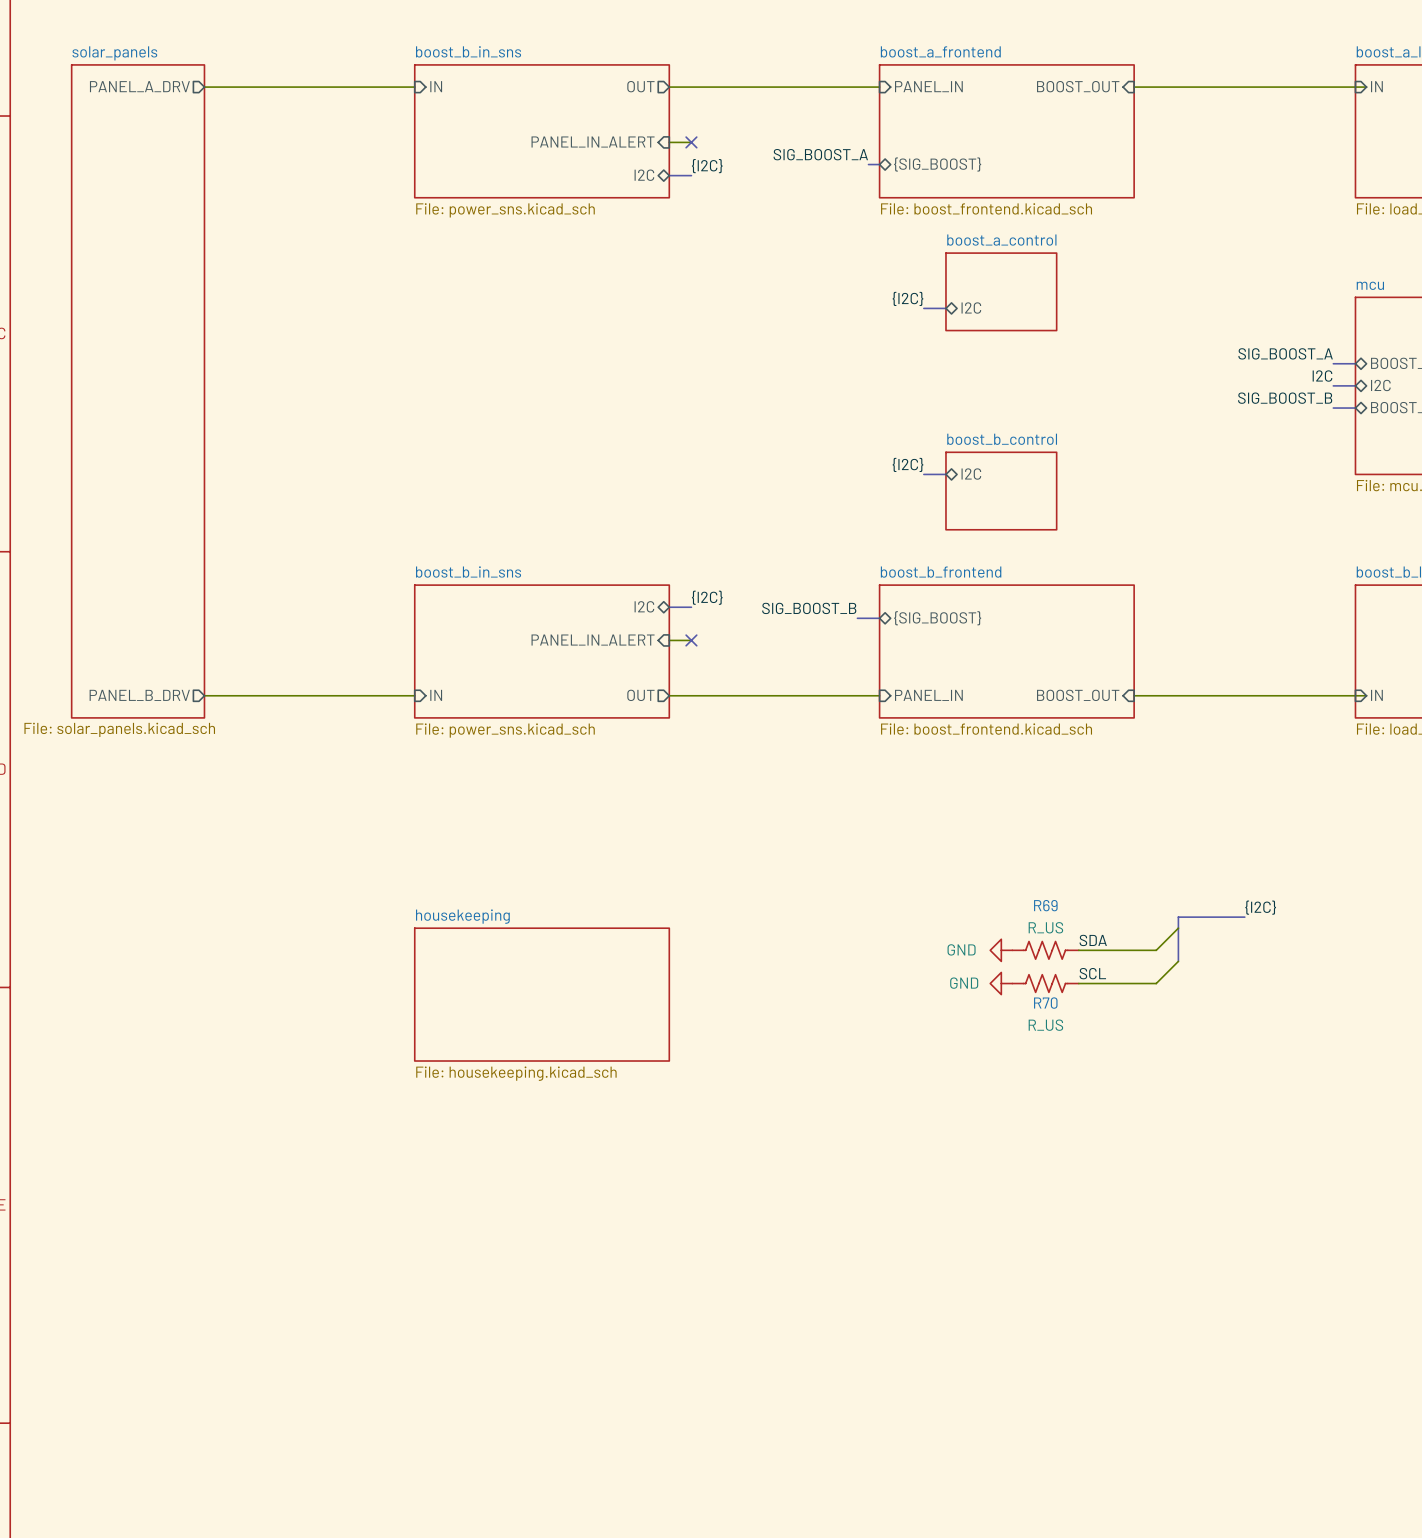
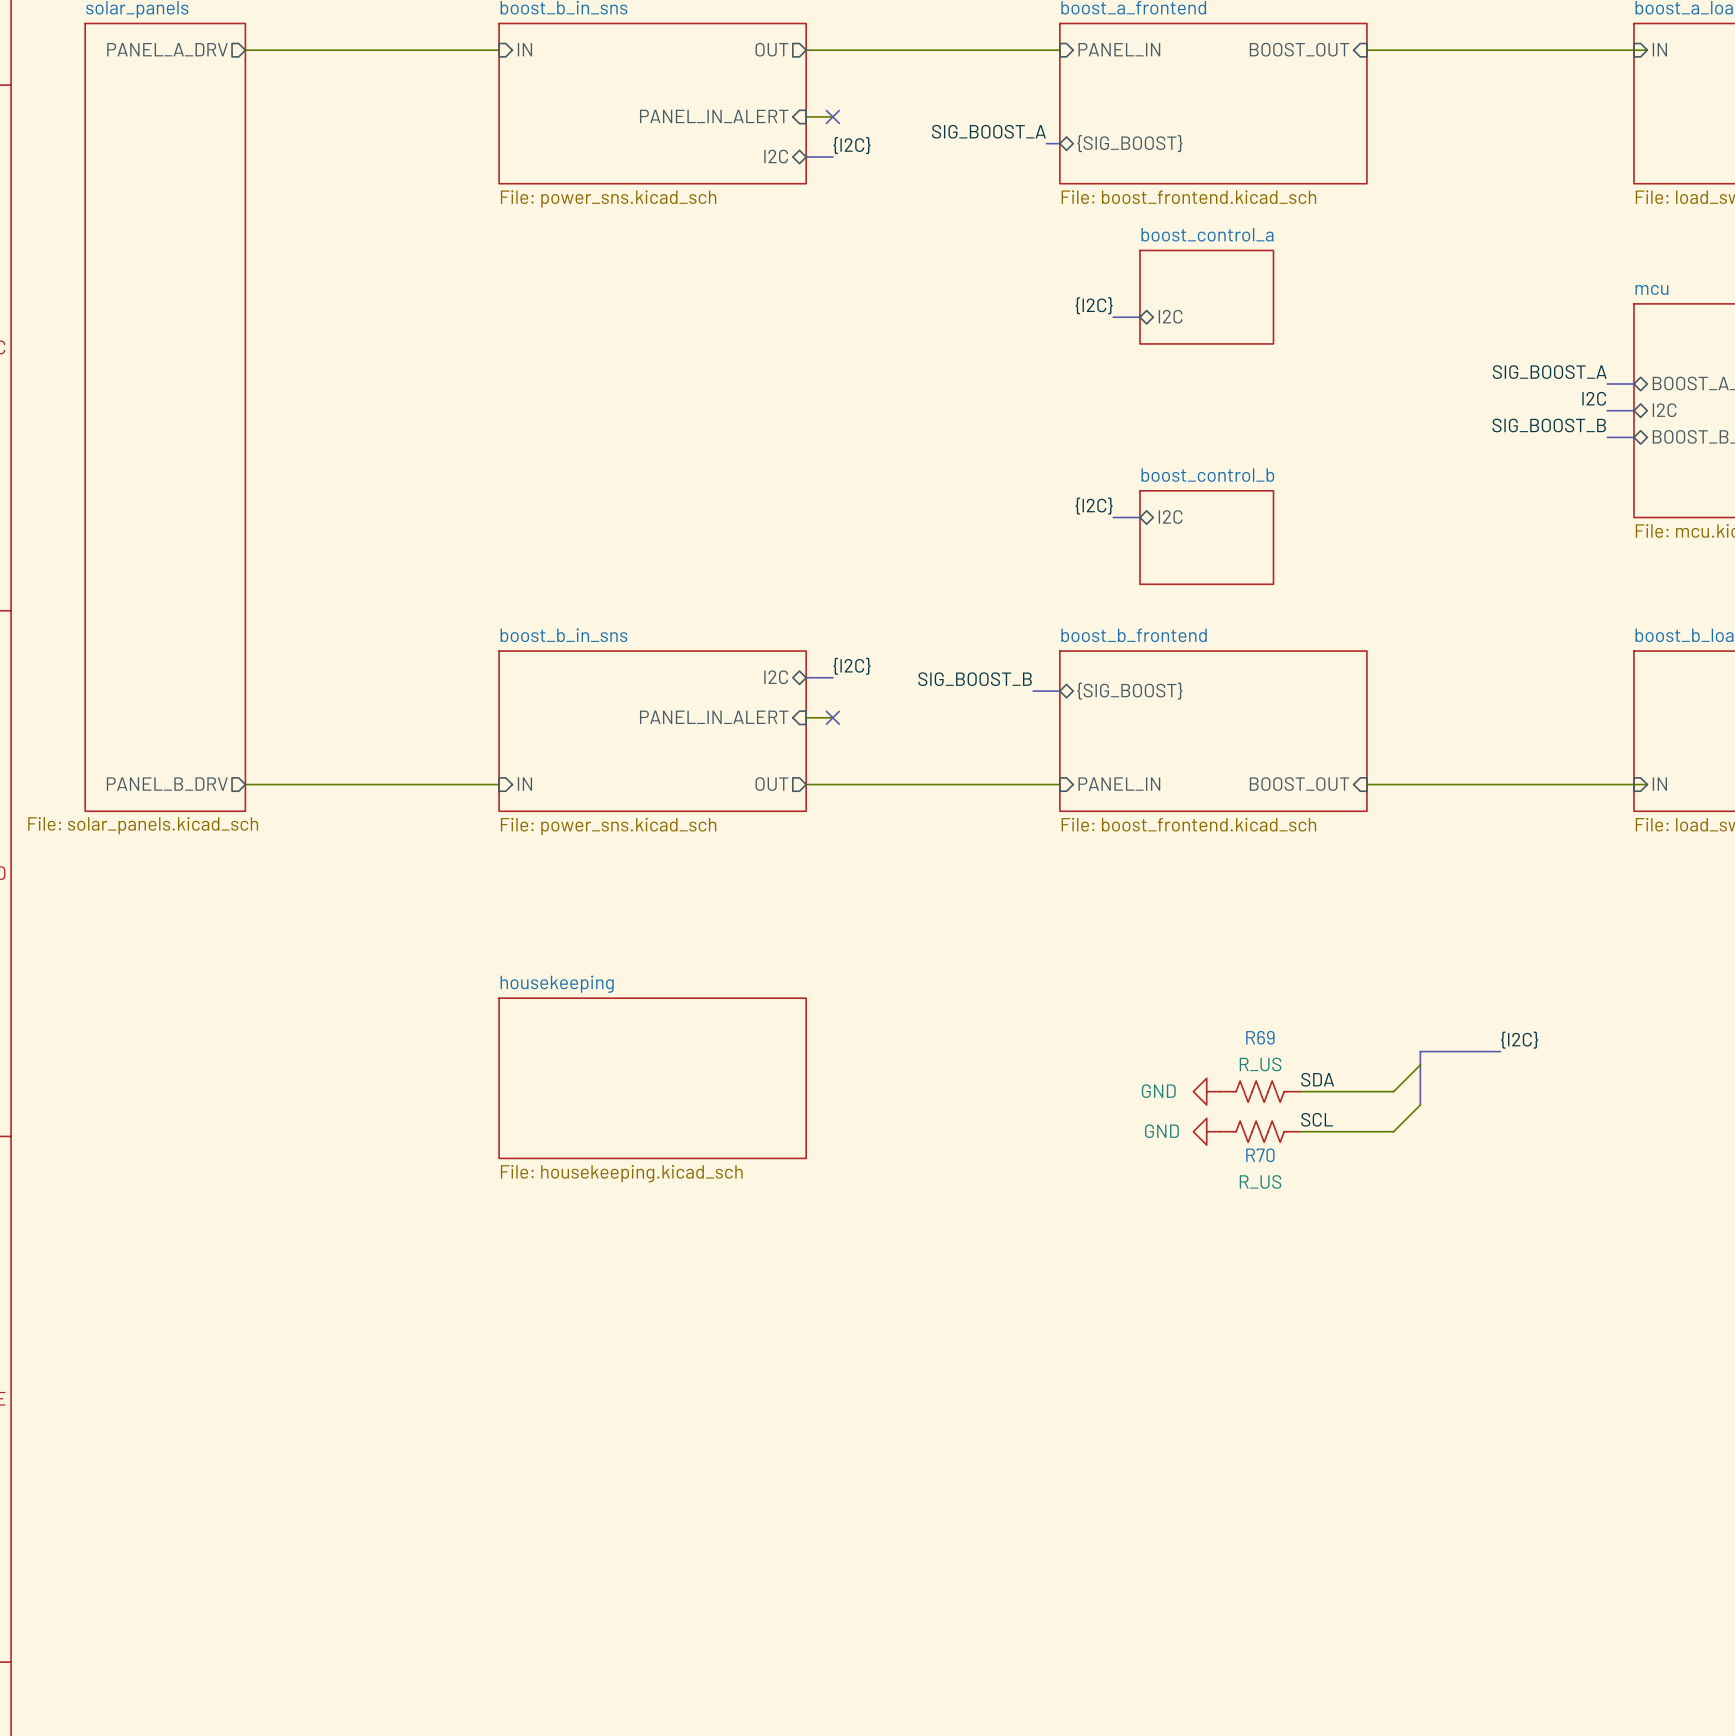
sheet boost_a_control name: boost_a_control (1001, 240) -> boost_control_a (1207, 234)
sheet boost_b_control name: boost_b_control (1002, 439) -> boost_control_b (1207, 475)
sheet housekeeping position: (542, 994) -> (652, 1078)

